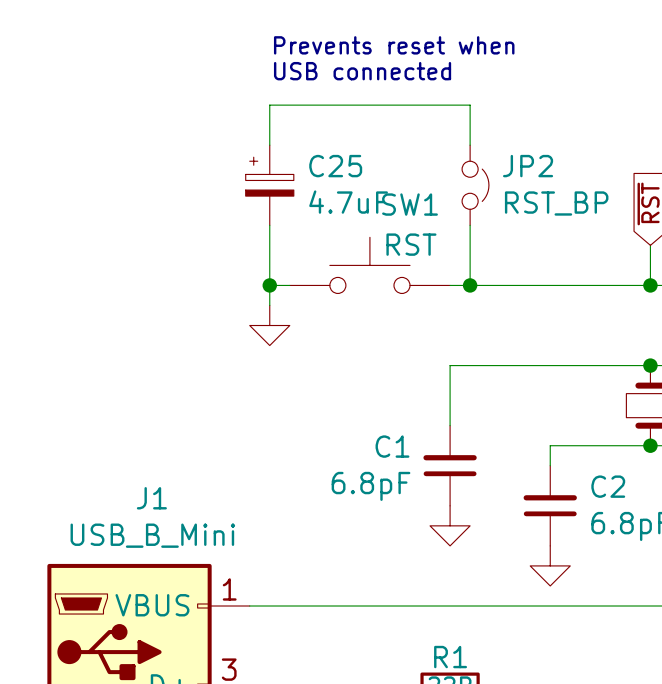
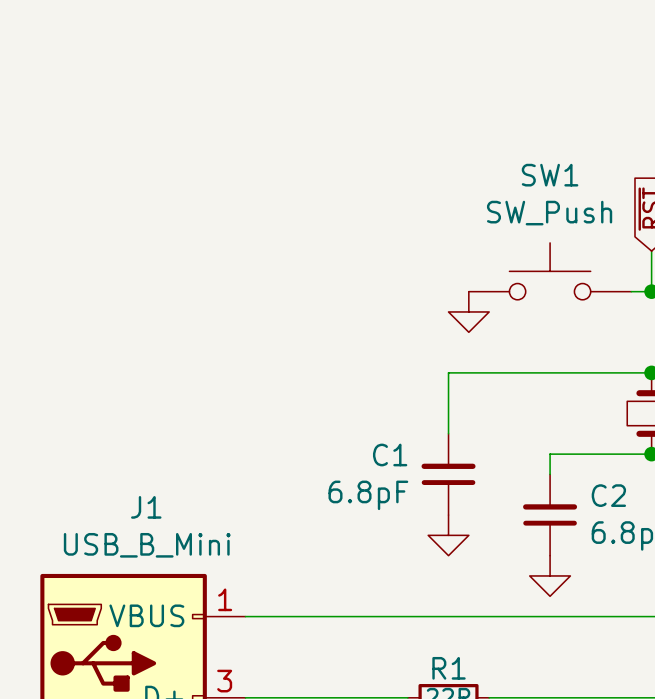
text: Prevents reset when (394, 45) -> none
text: USB connected (362, 71) -> none
wire: (269, 145) (269, 105) (470, 105) (470, 145) -> none
C25: 4.7uF (269, 185) -> none
JP2: RST_BP (475, 185) -> none
SW1 name position: SW1 (410, 204) -> SW1 (550, 175)
wire: (269, 225) (269, 305) -> none
wire: (470, 225) (470, 285) -> none
SW1 value: RST (411, 244) -> SW_Push (549, 213)
SW1 position: (369, 265) -> (550, 271)
wire: (269, 285) (289, 285) -> none
junction: (269, 285) -> none
wire: (450, 285) (630, 285) -> none
junction: (470, 285) -> none
power symbol position: (269, 325) -> (468, 311)

